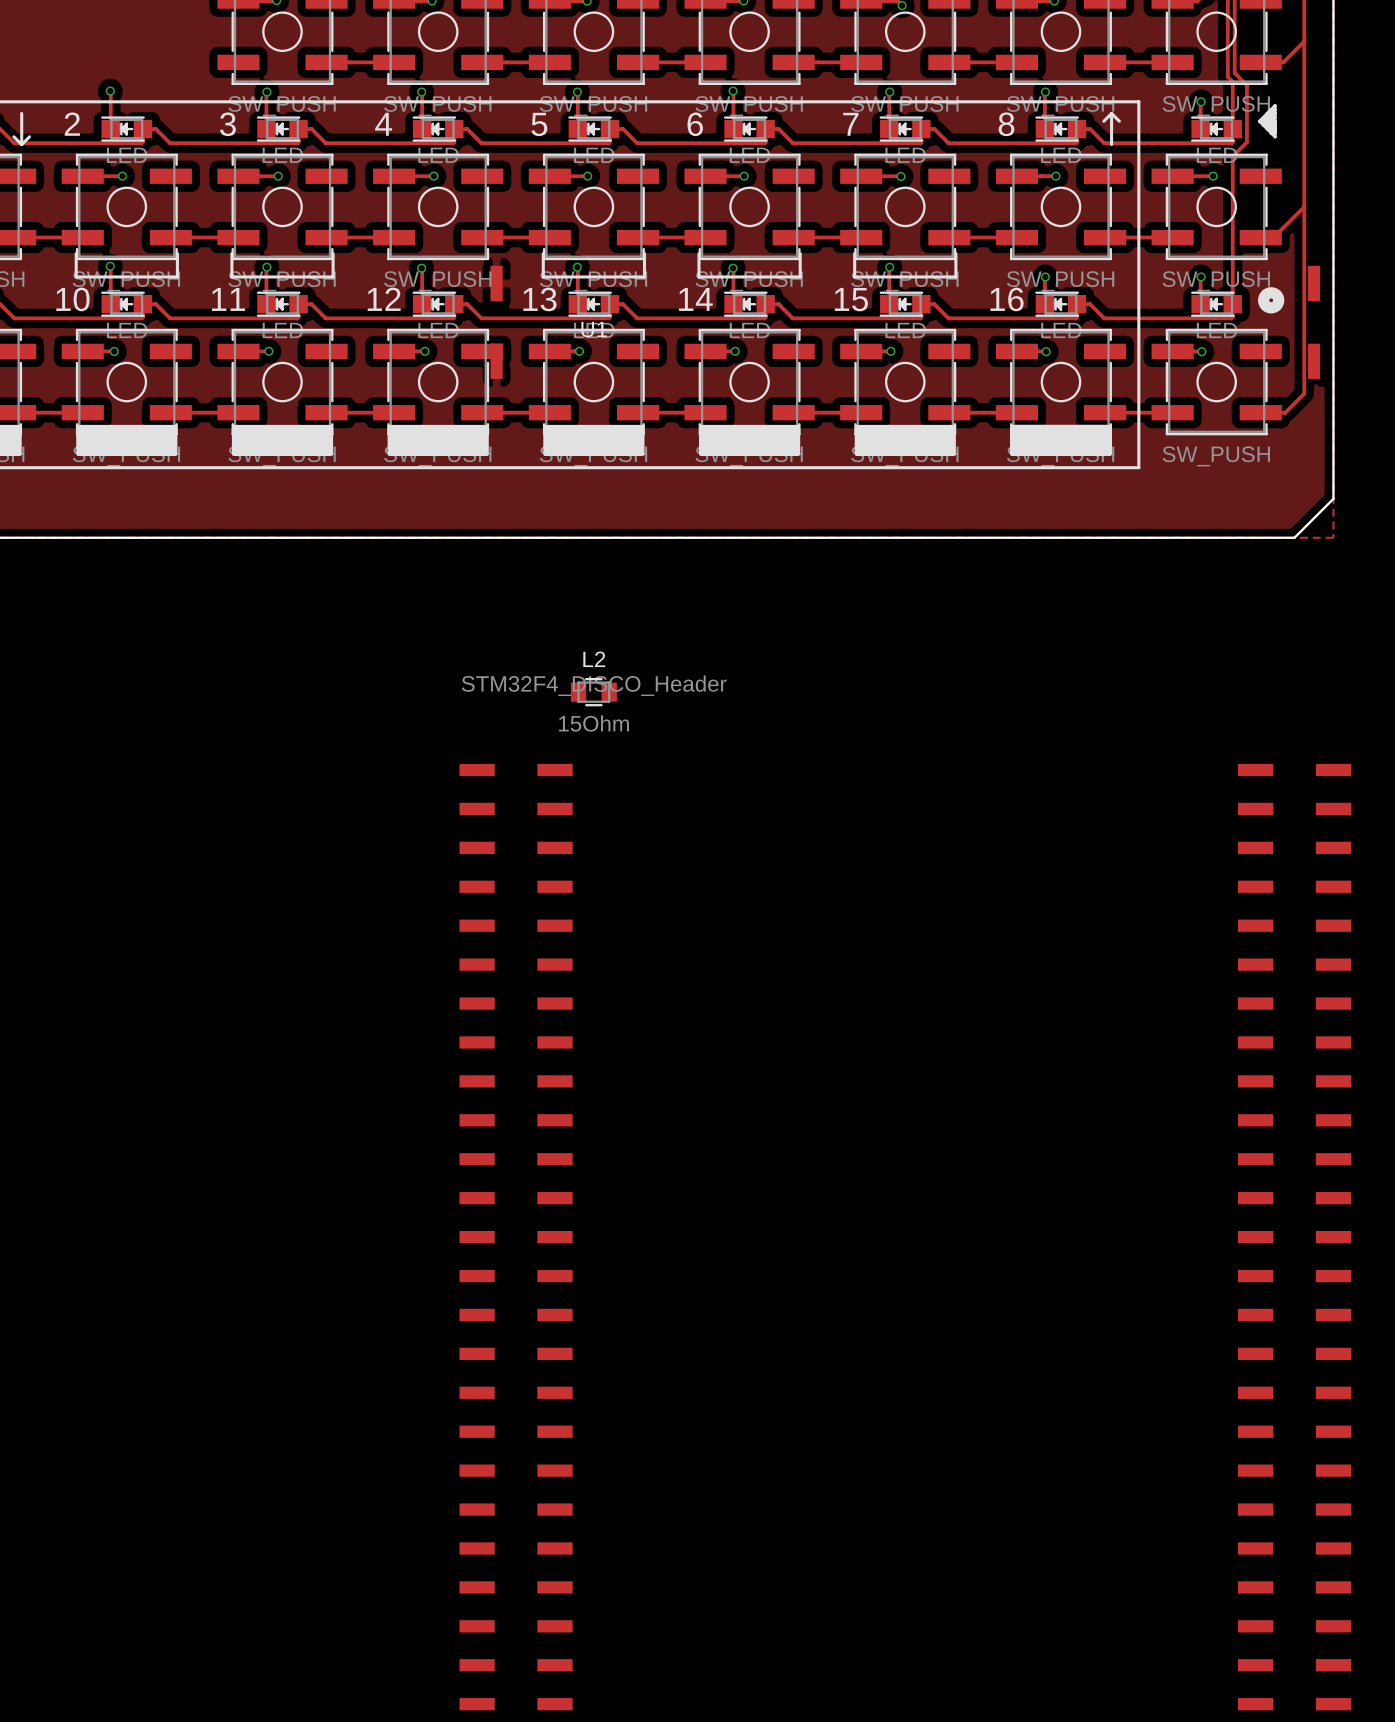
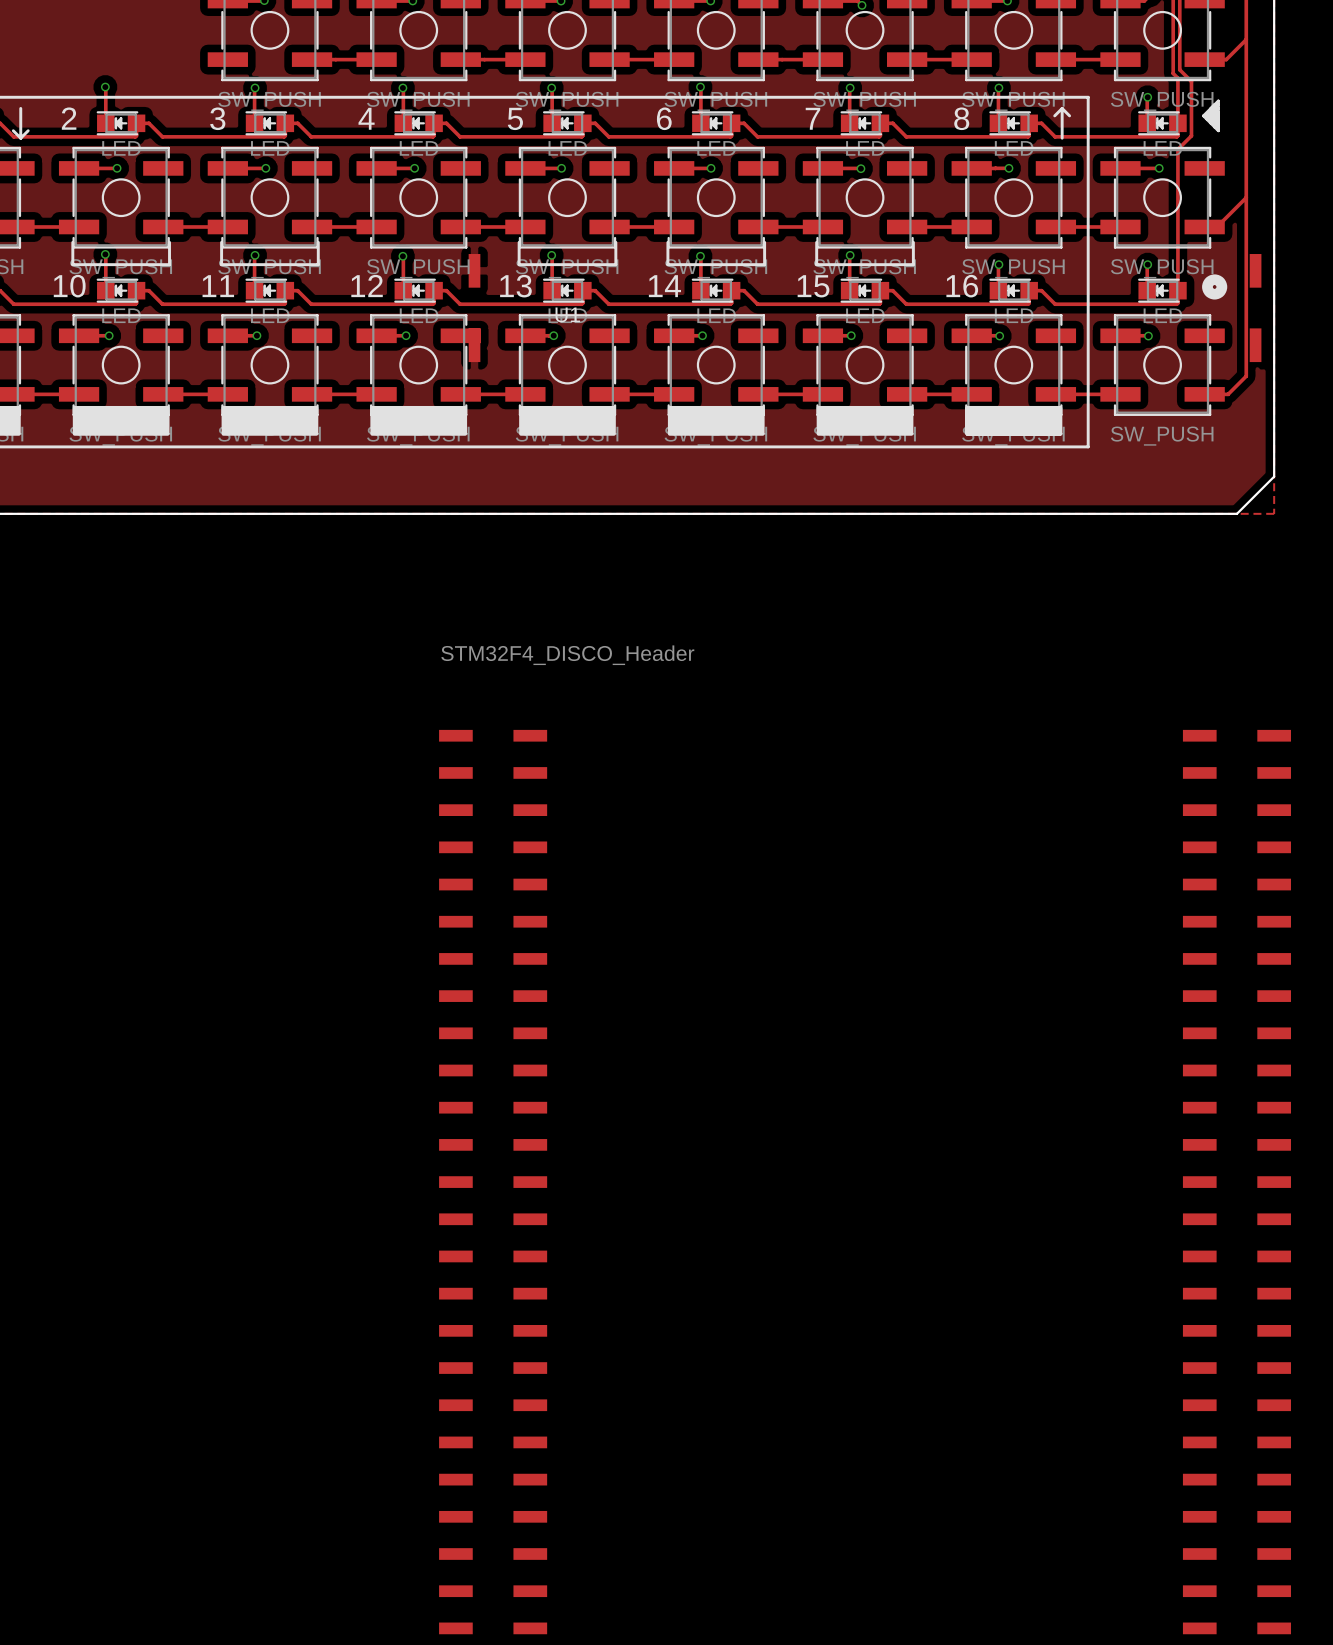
L2: 15Ohm (593, 692) -> none

